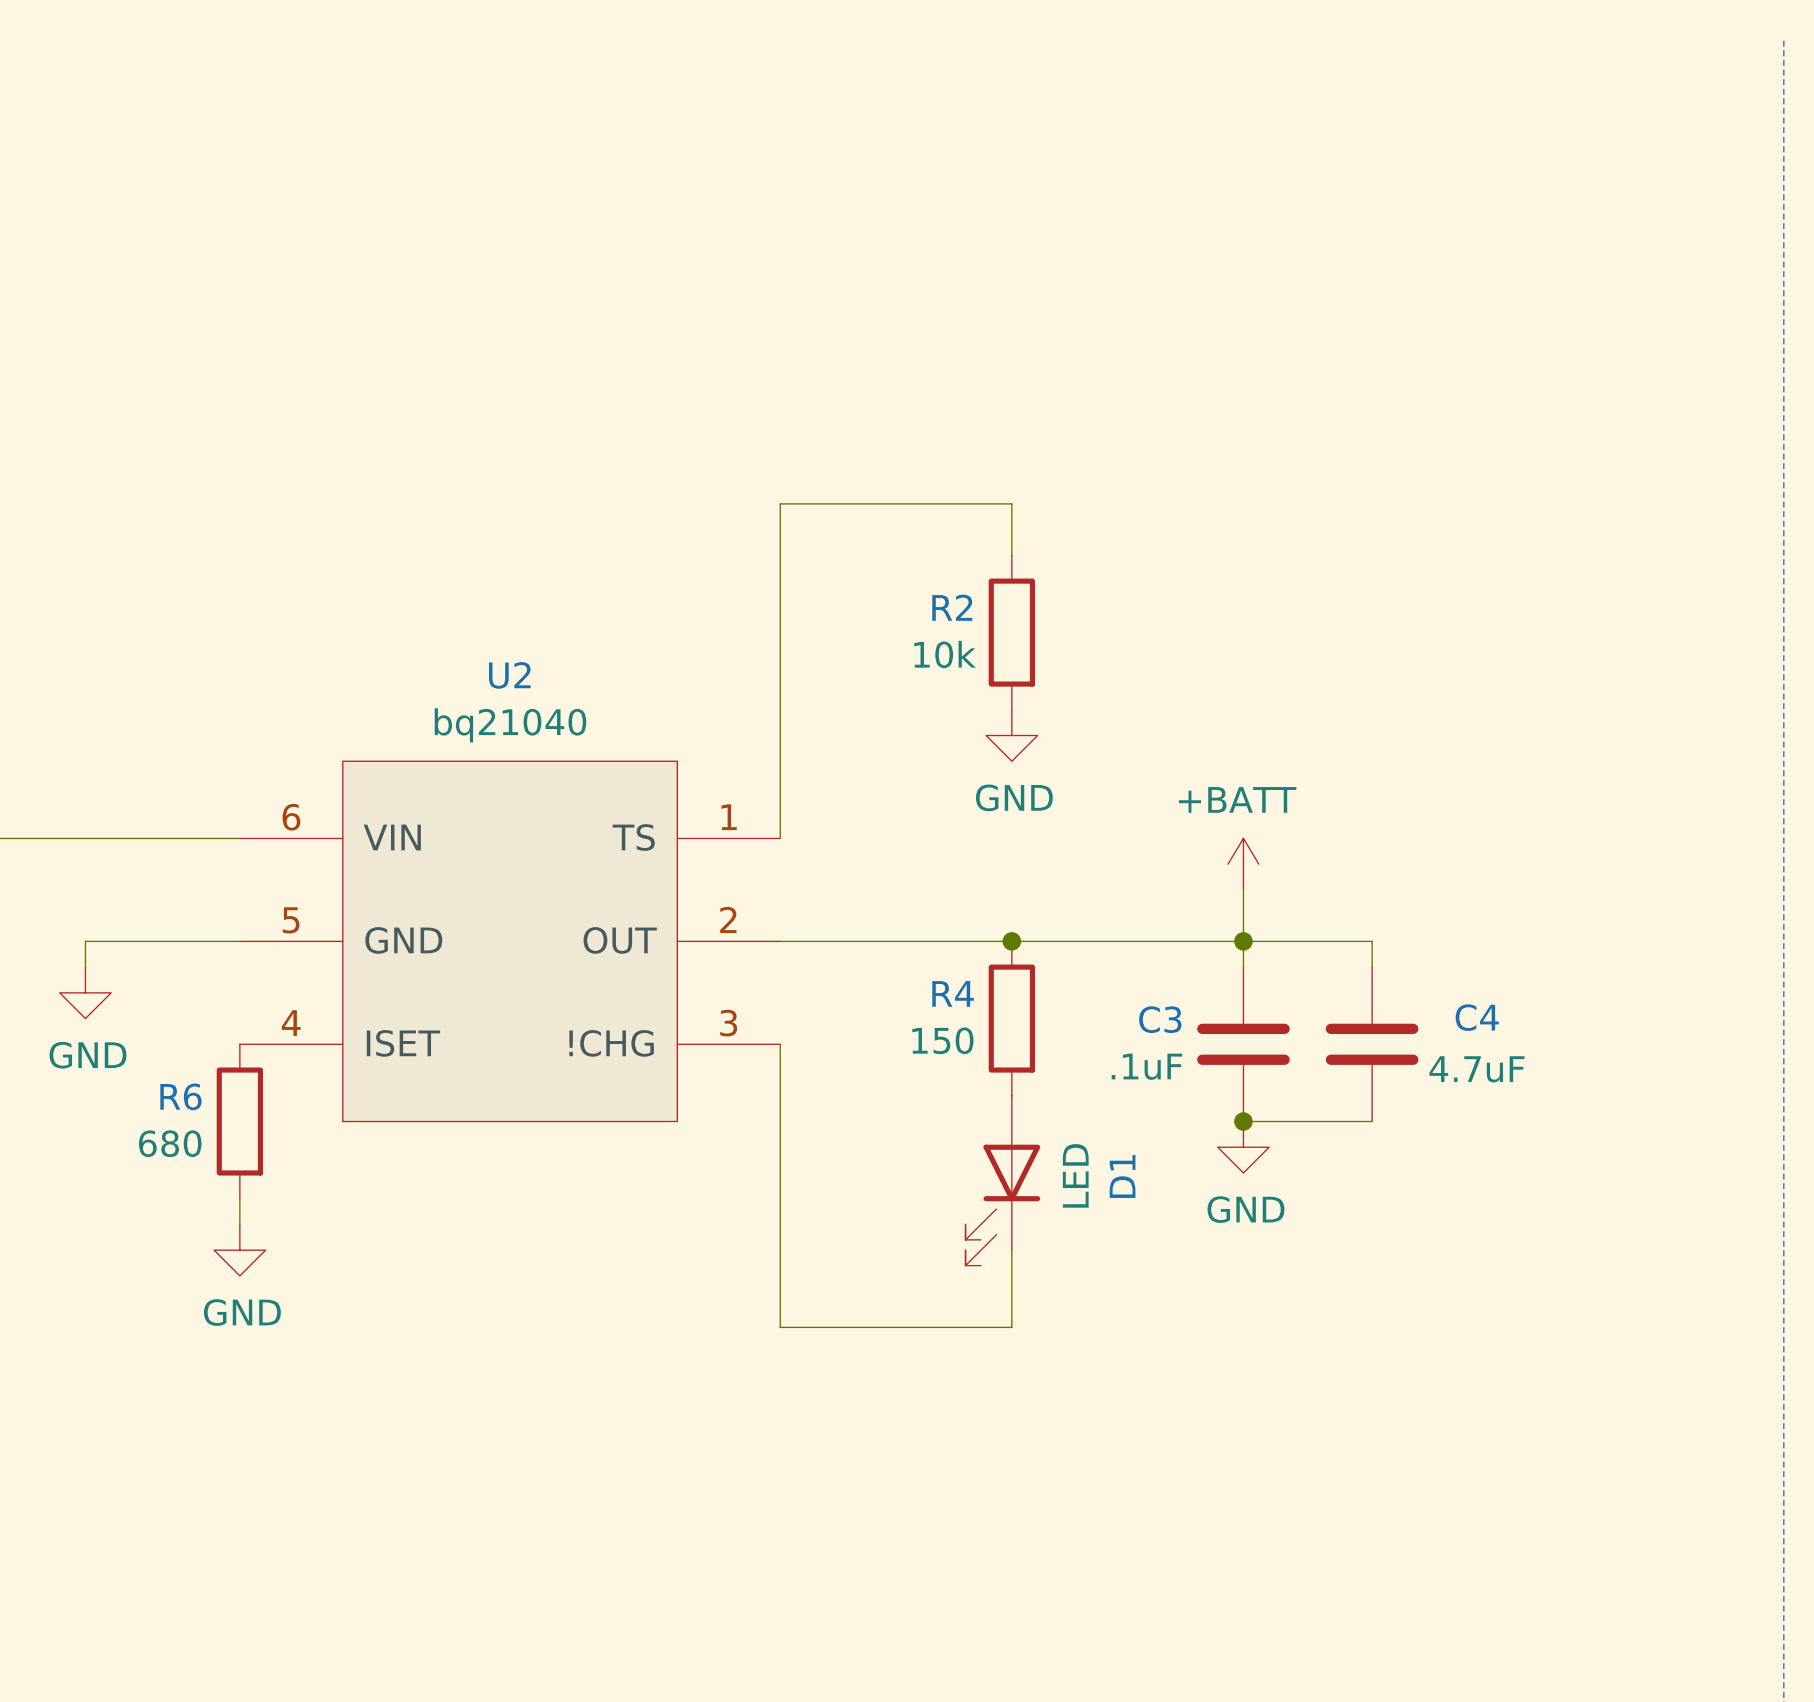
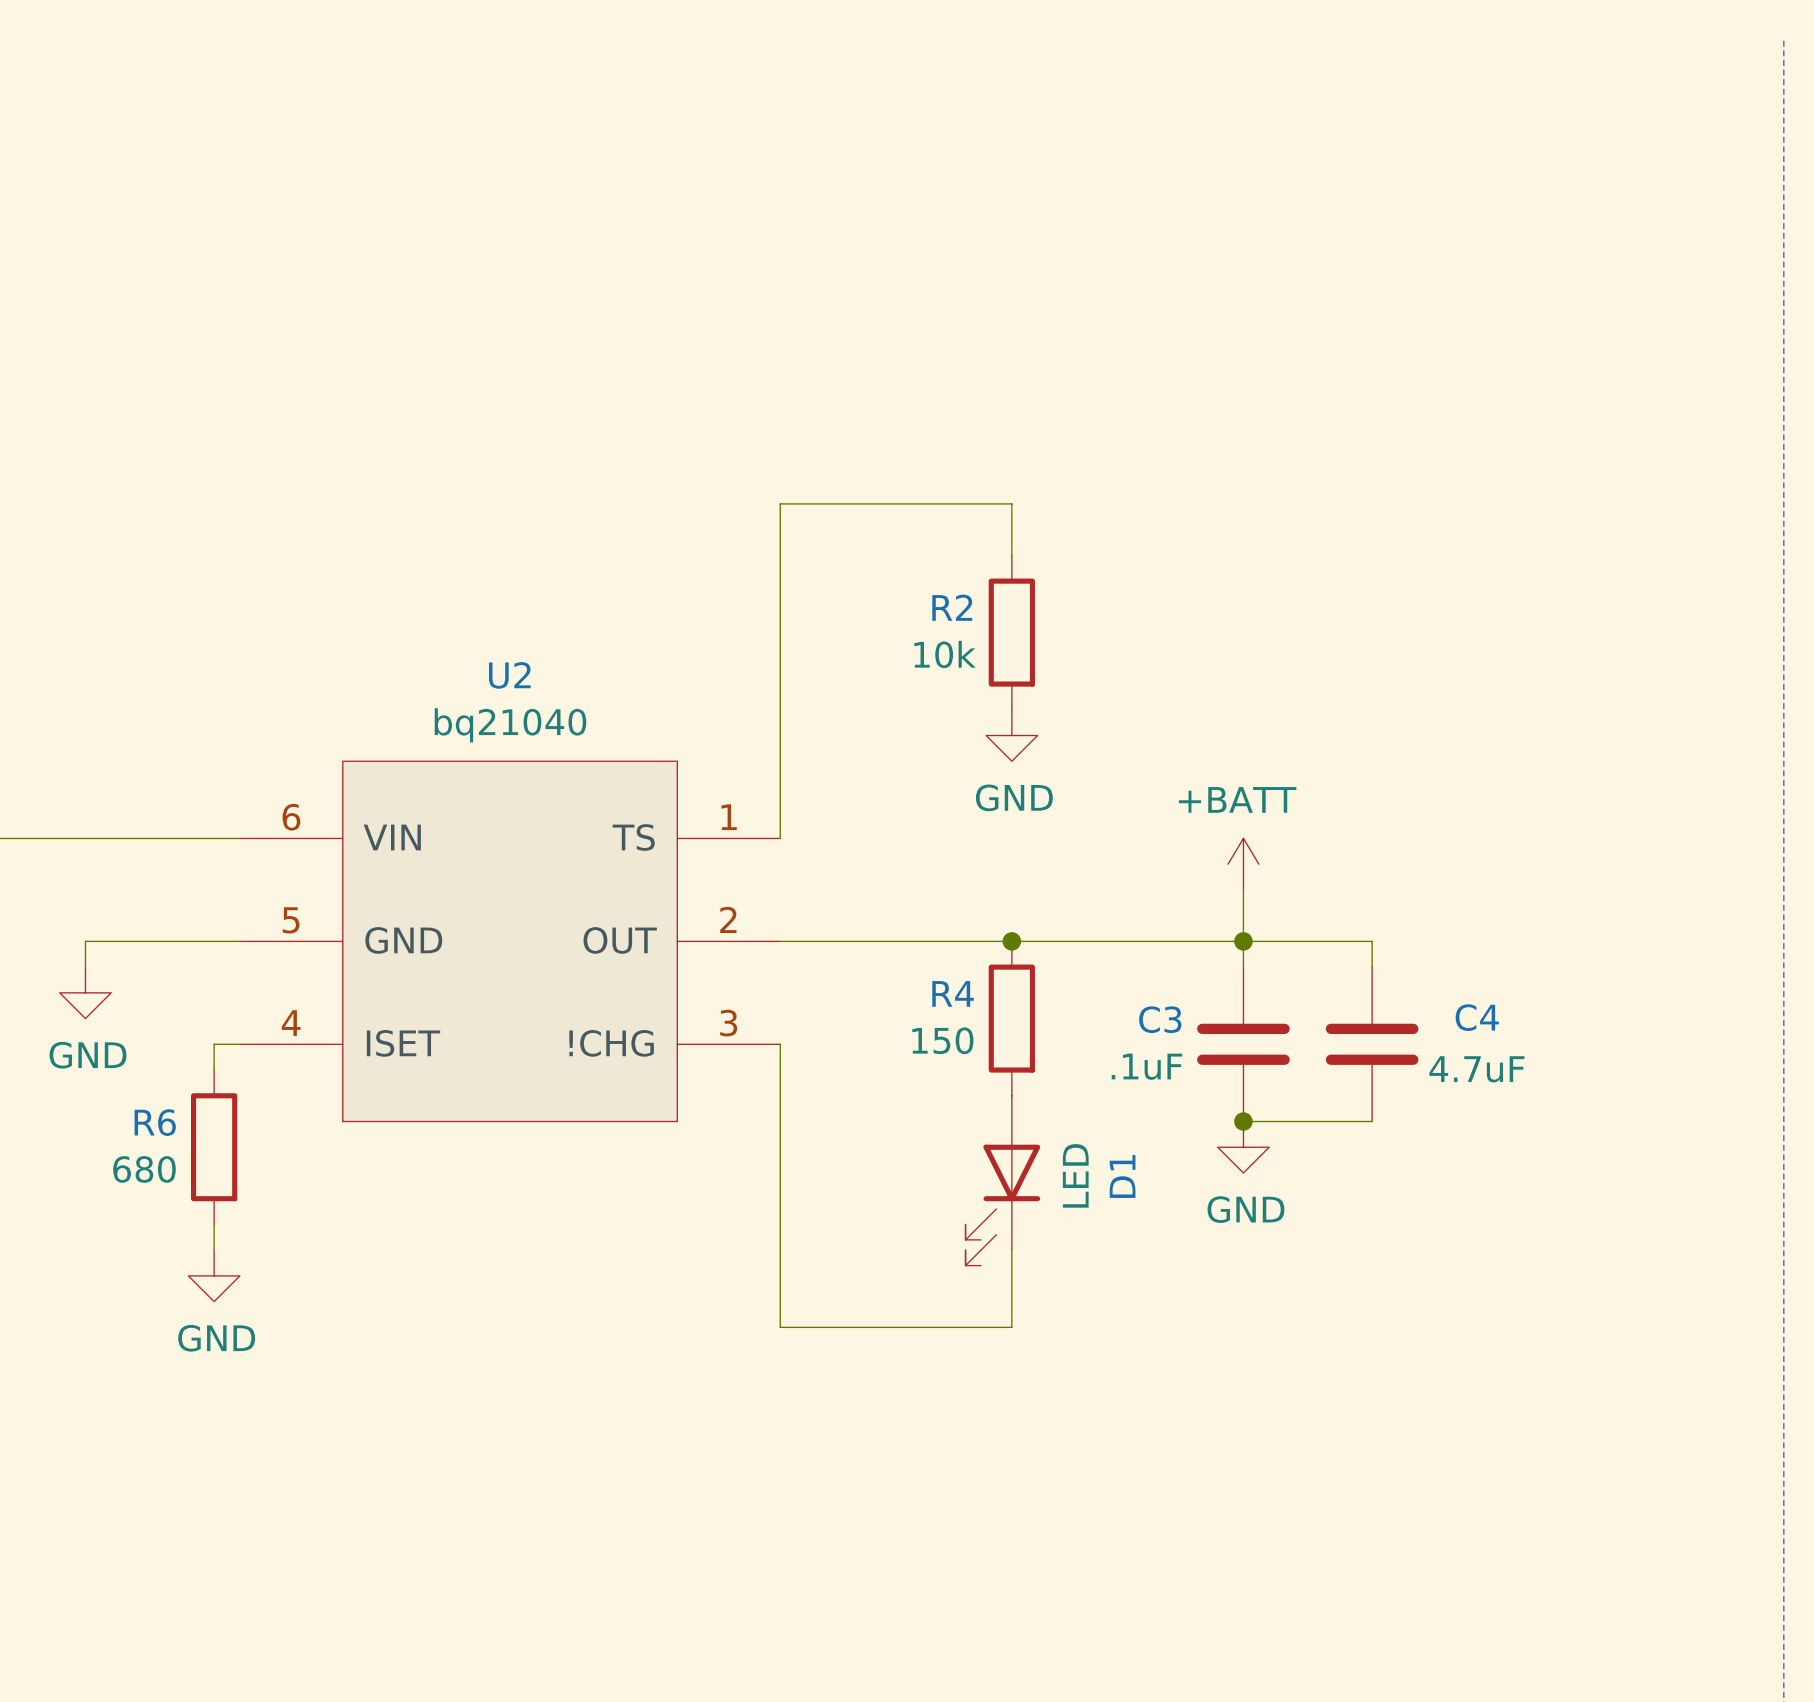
wire: none -> (239, 1044) (214, 1044) (214, 1070)
R6 position: (239, 1121) -> (214, 1147)
wire: (239, 1198) (239, 1224) -> (214, 1224) (214, 1250)
power symbol position: GND (239, 1250) -> GND (214, 1275)

